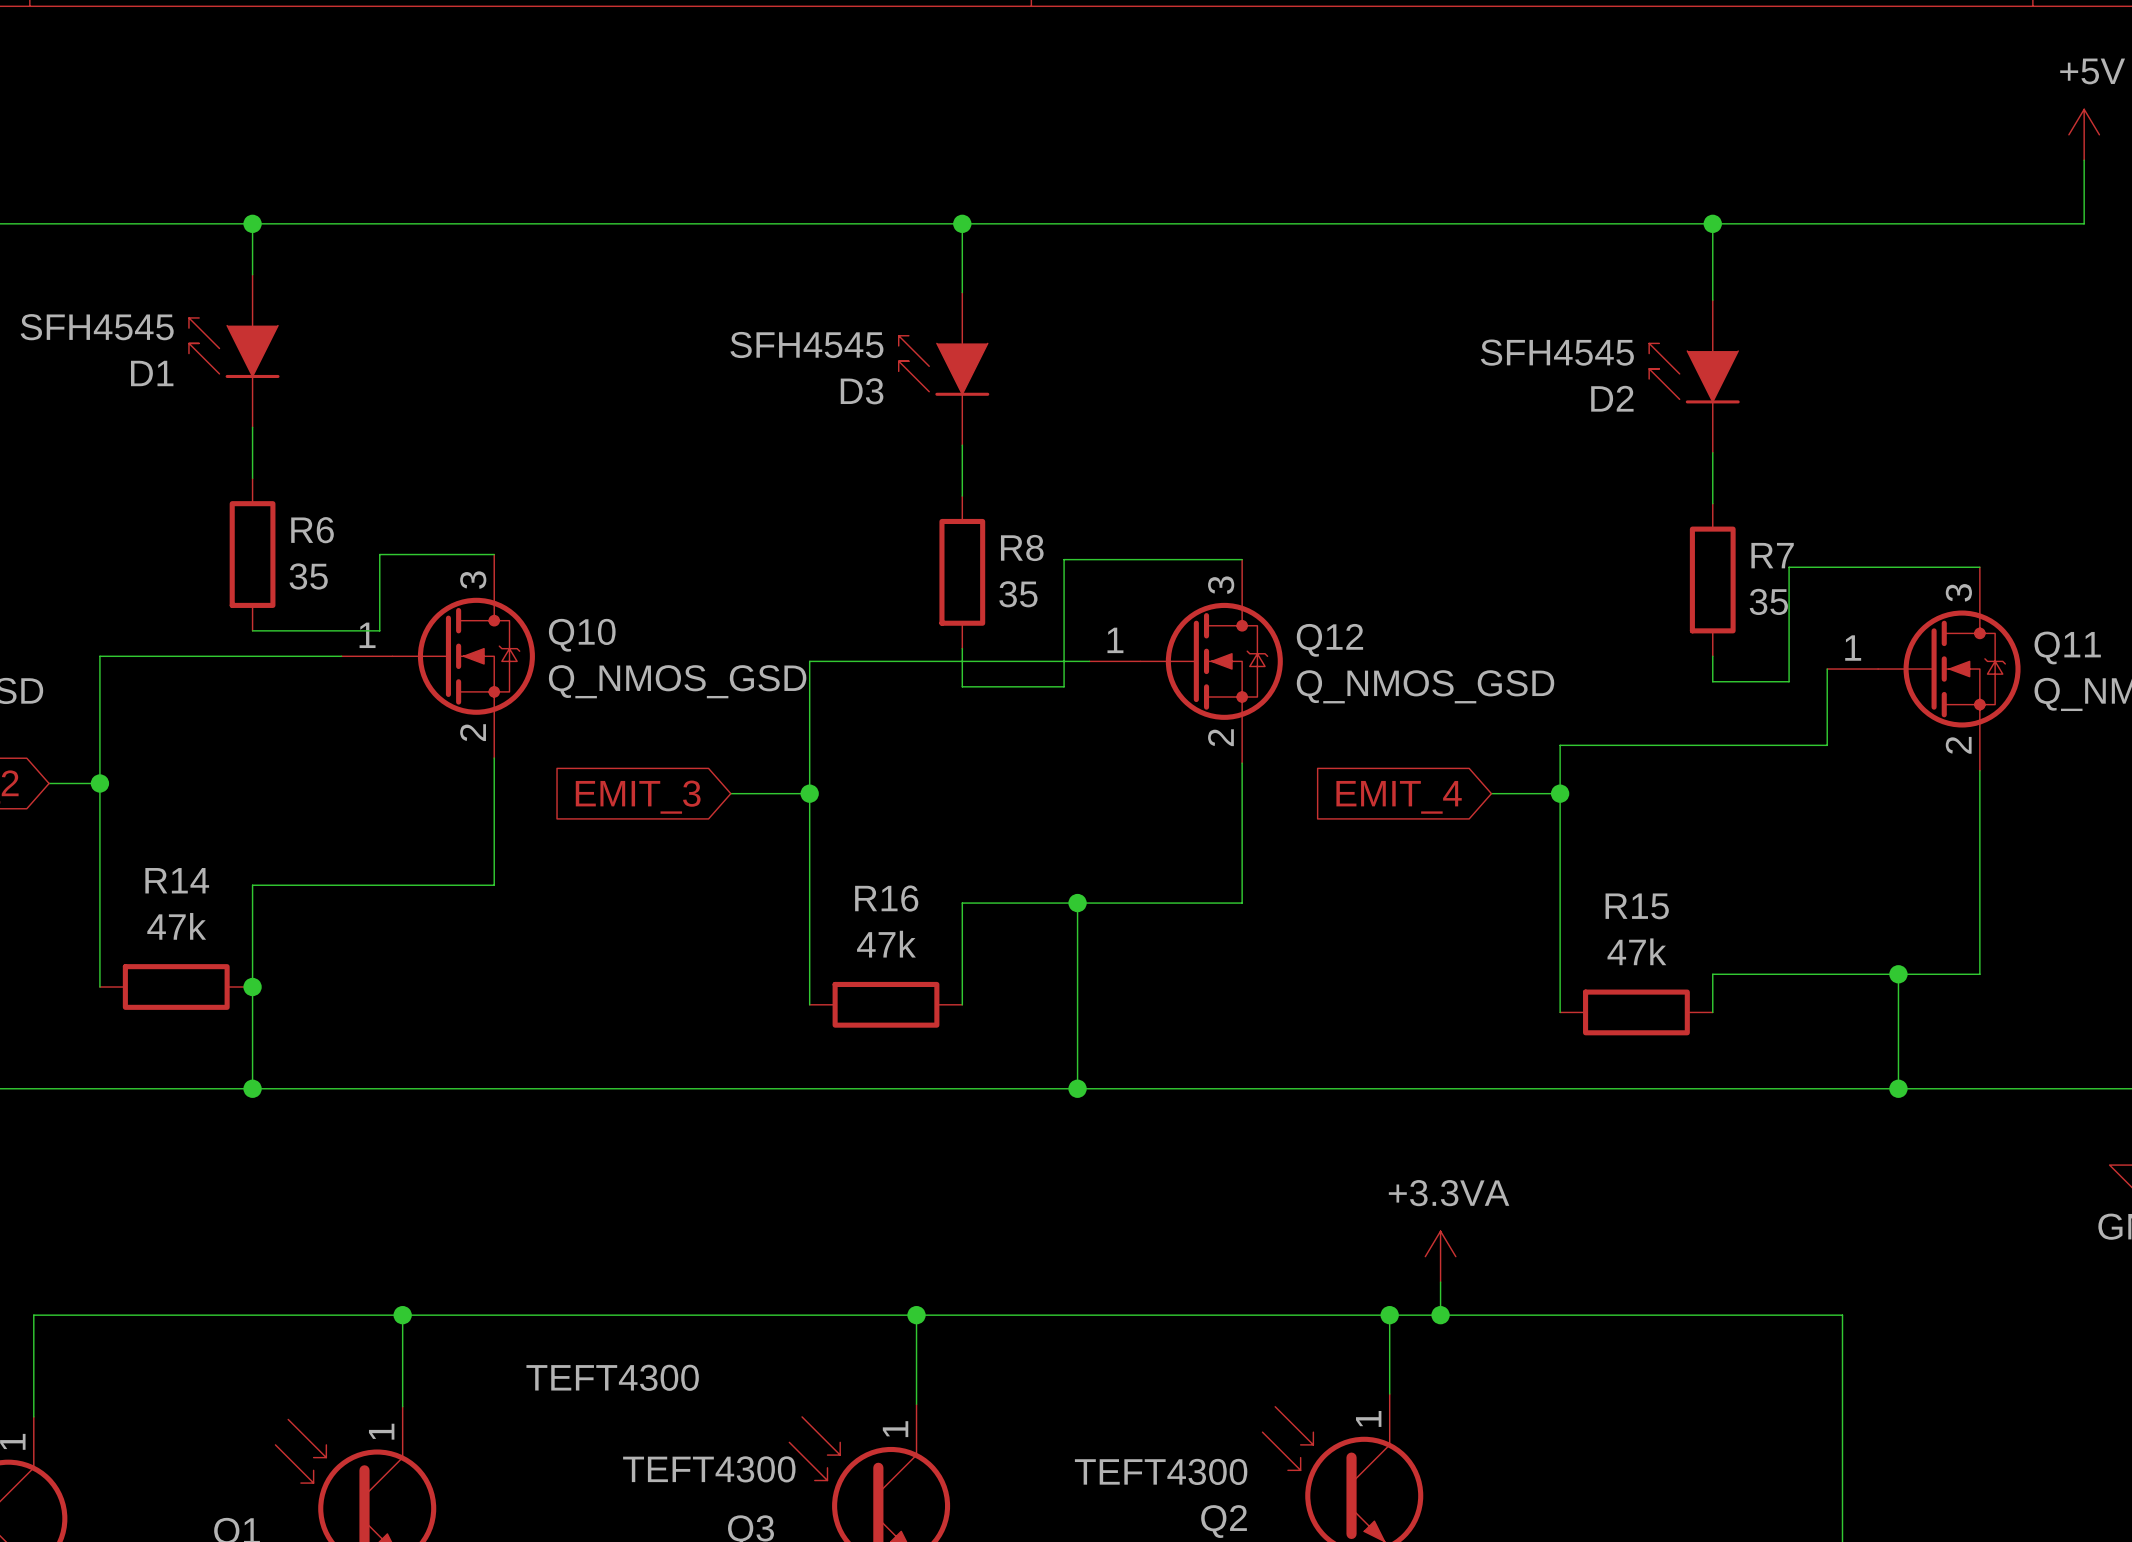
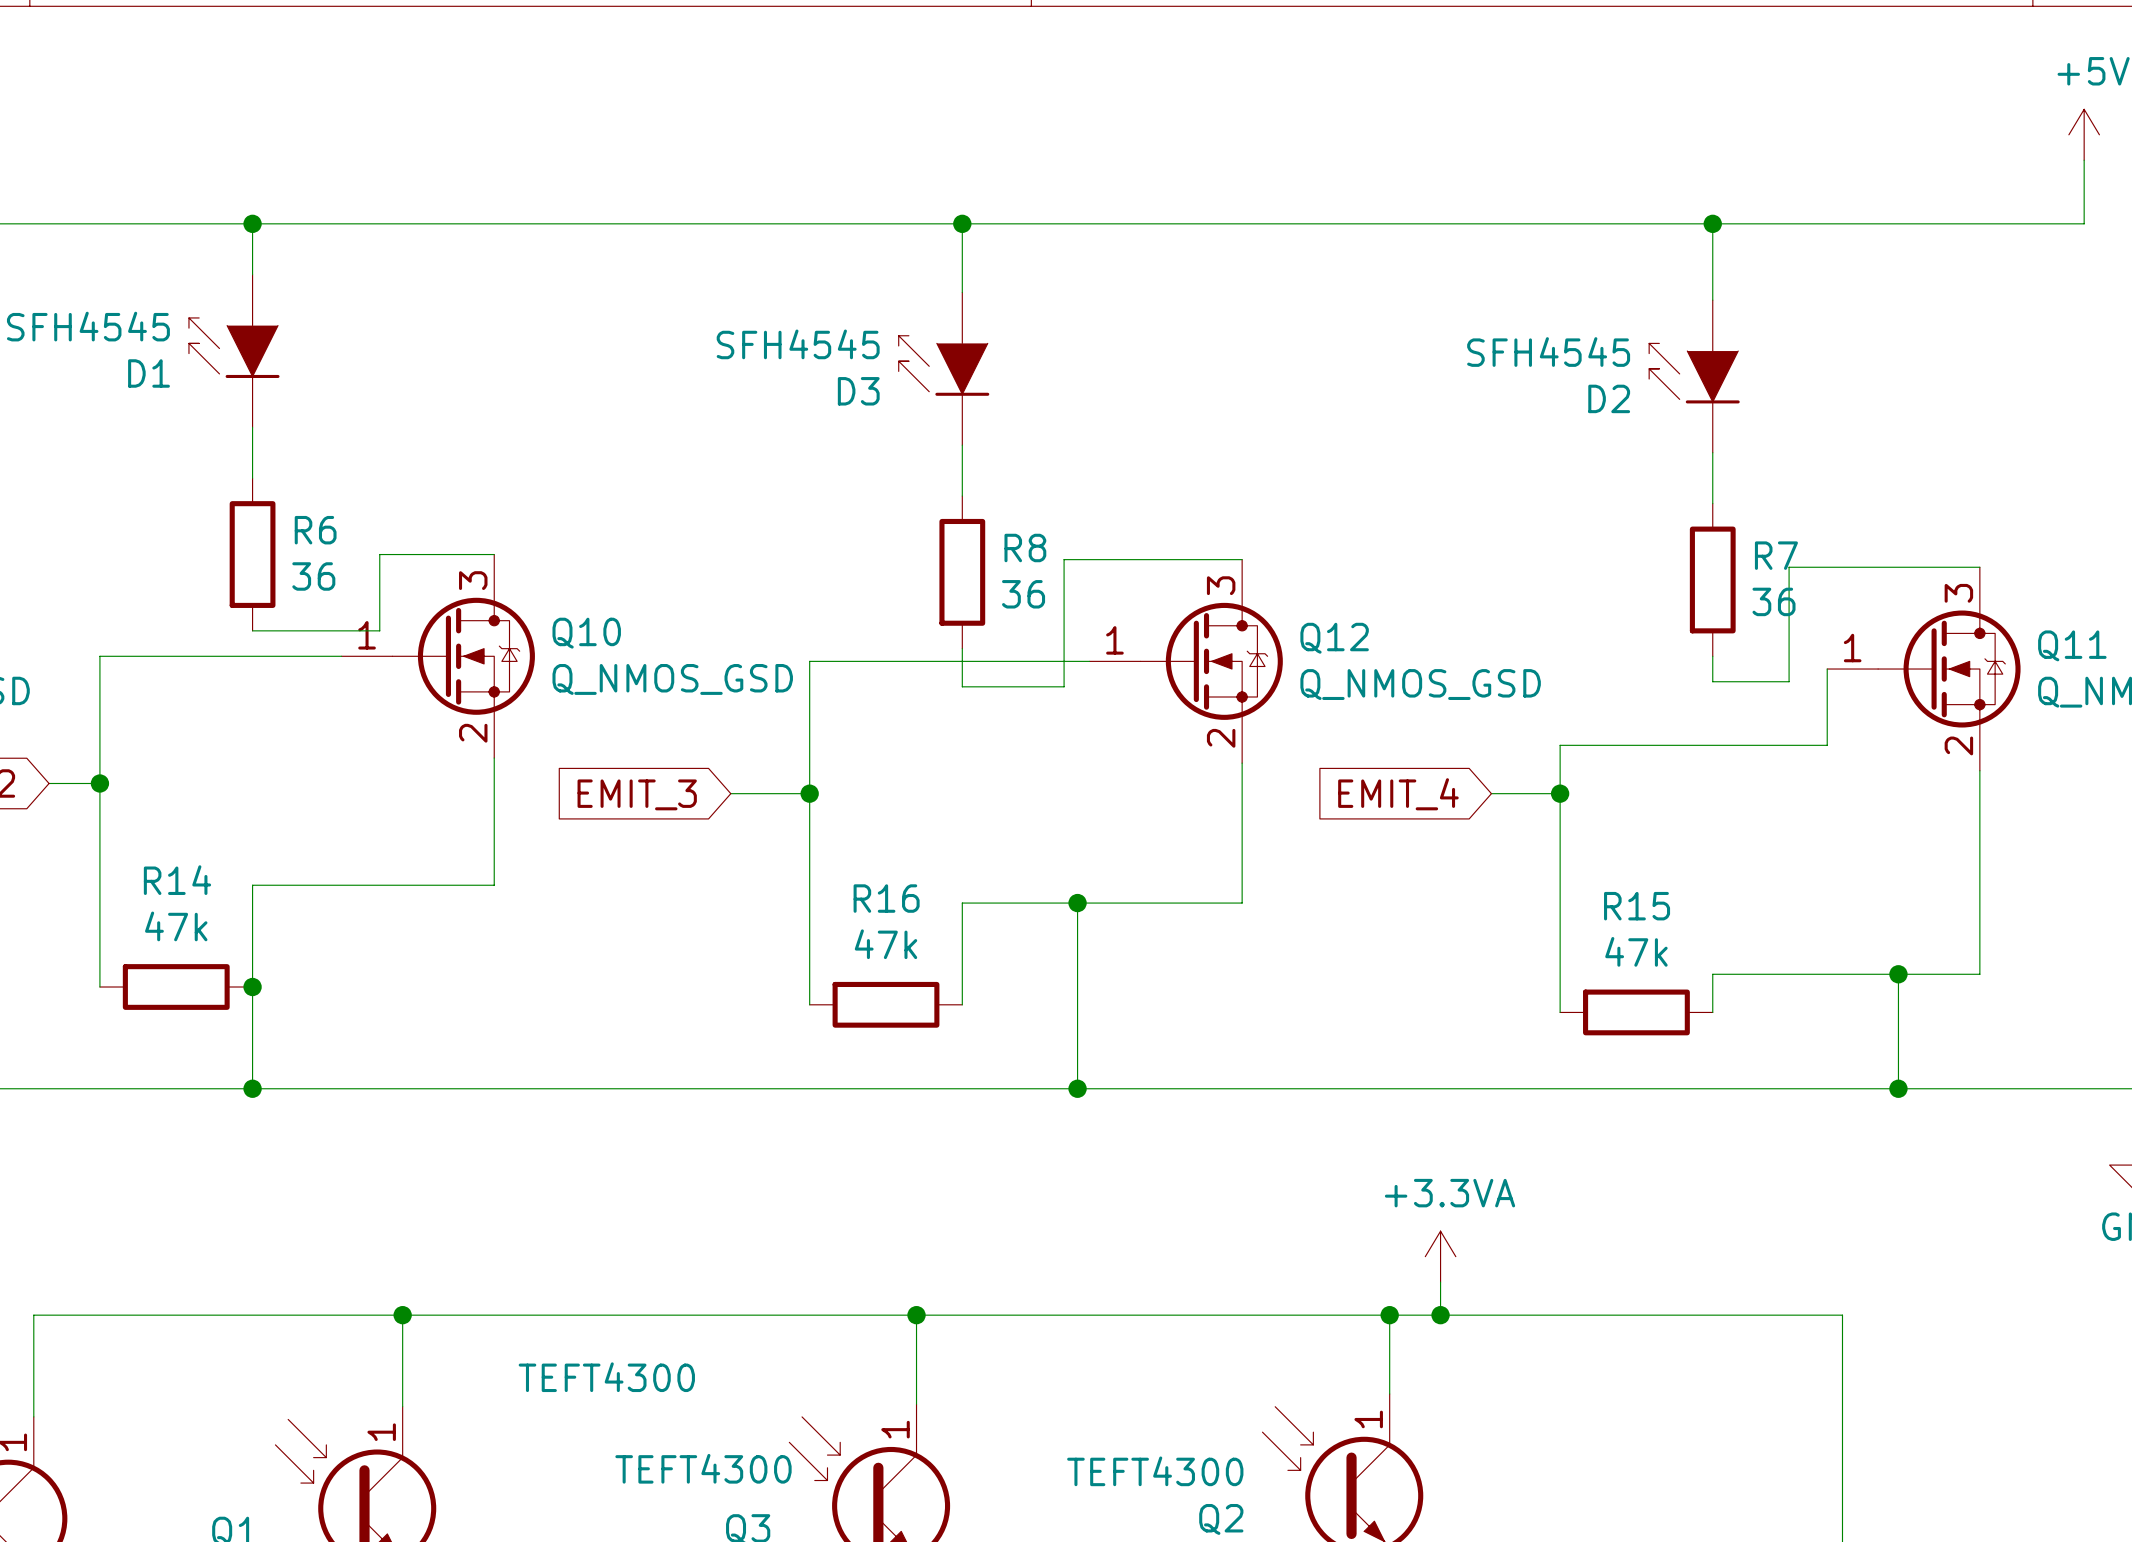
R6 value: 35 (308, 576) -> 36 (313, 576)
R8 value: 35 (1018, 594) -> 36 (1023, 594)
R7 value: 35 (1768, 601) -> 36 (1774, 601)

